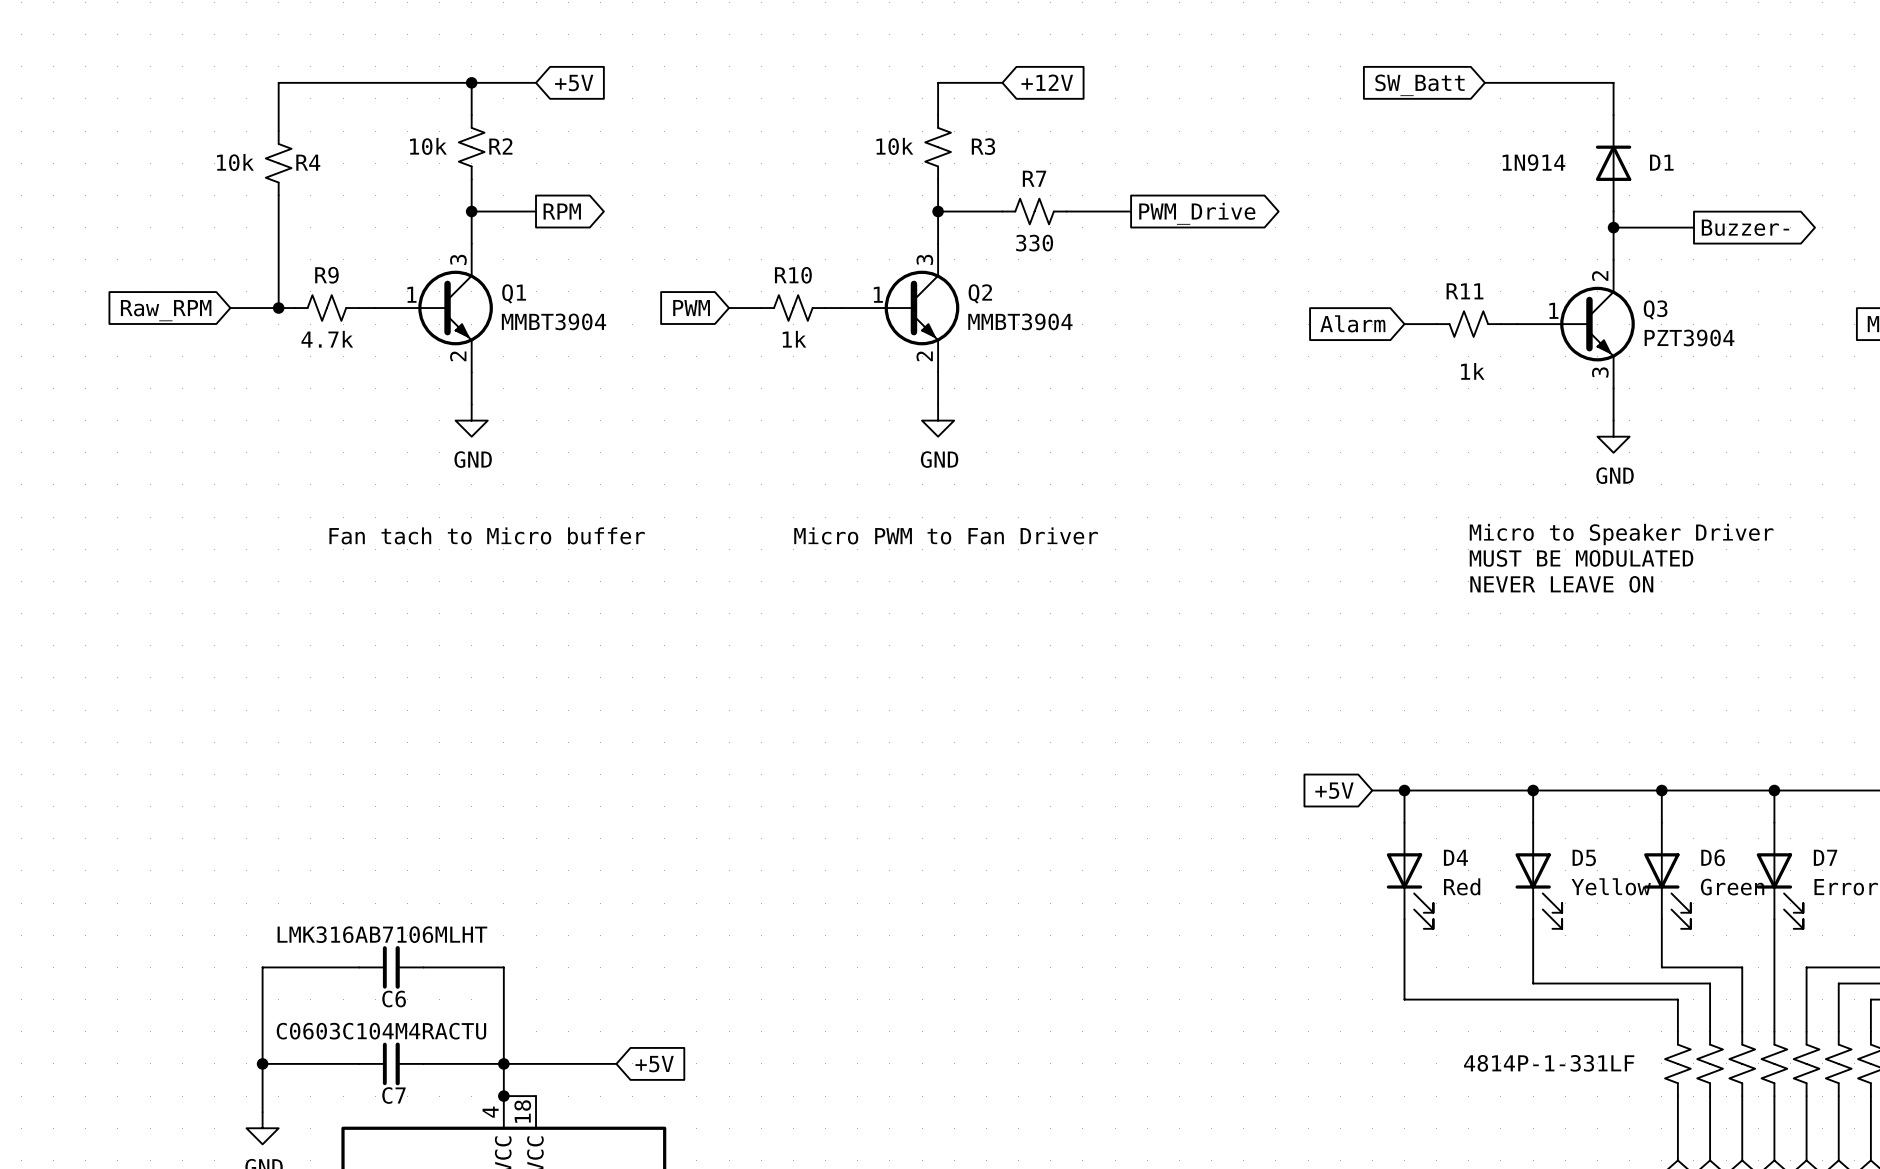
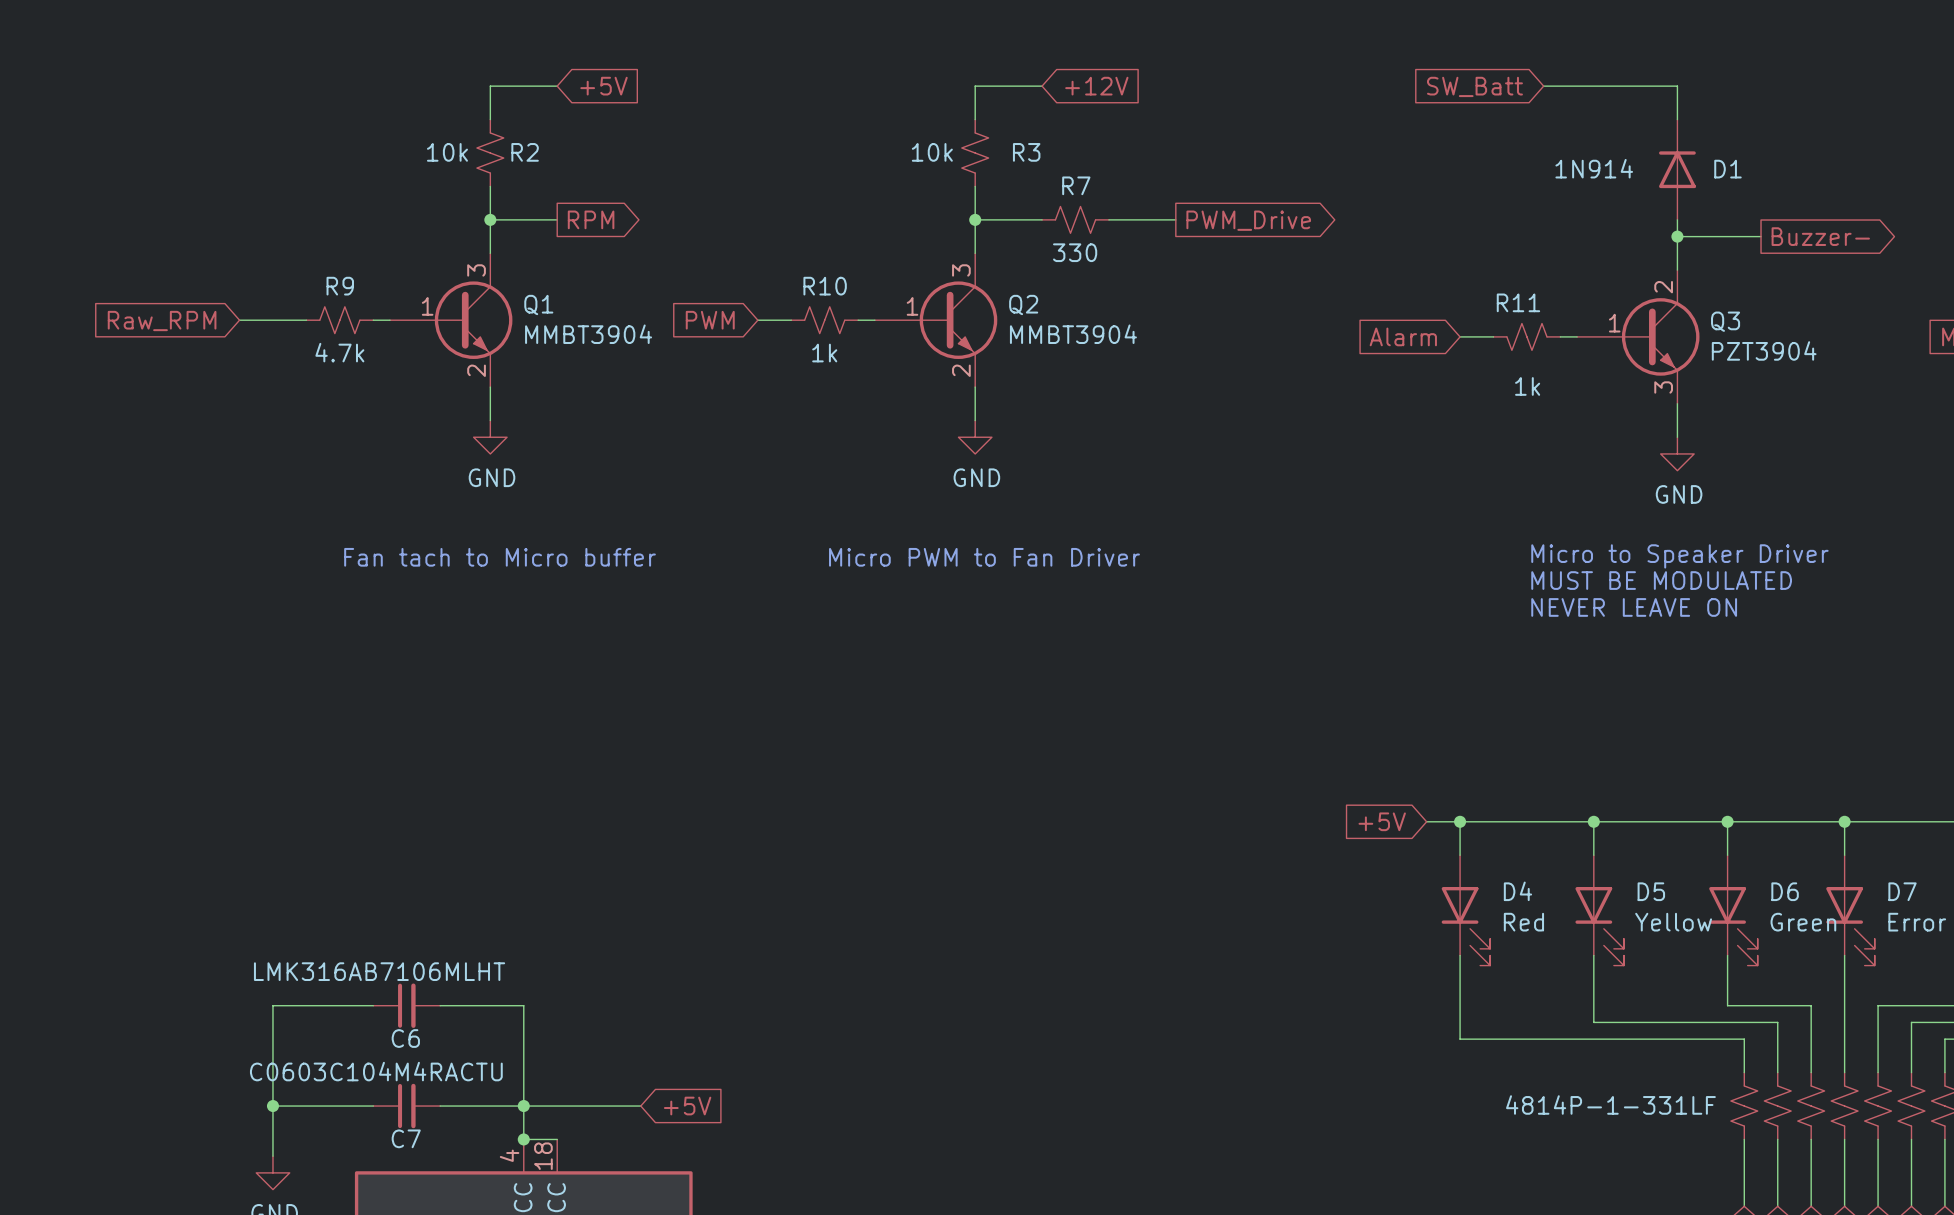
wire: (471, 82) (278, 82) (278, 131) -> none
junction: (471, 82) -> none
R4: 10k (278, 163) -> none
wire: (278, 195) (278, 308) -> none
junction: (278, 308) -> none

